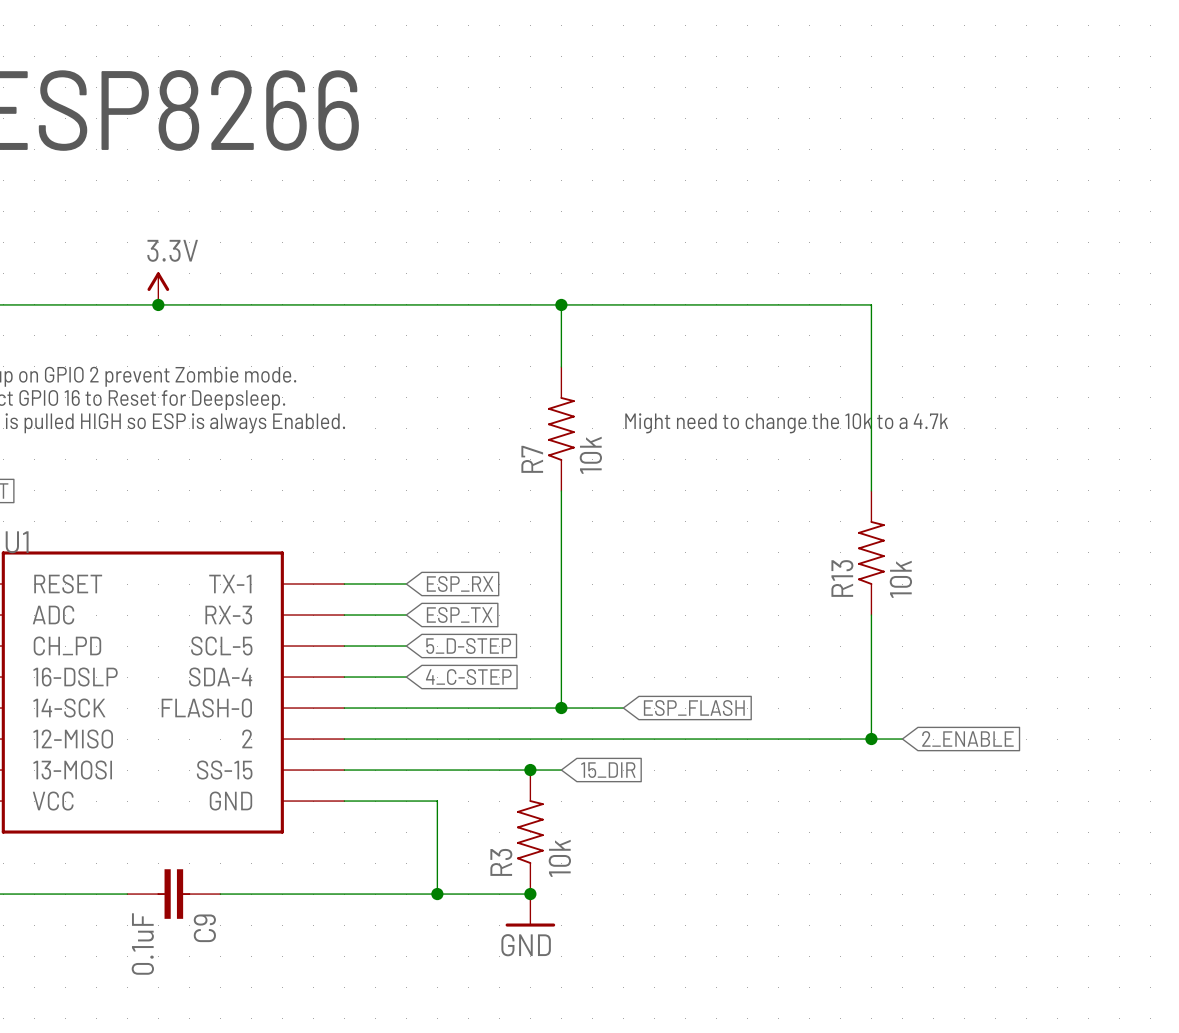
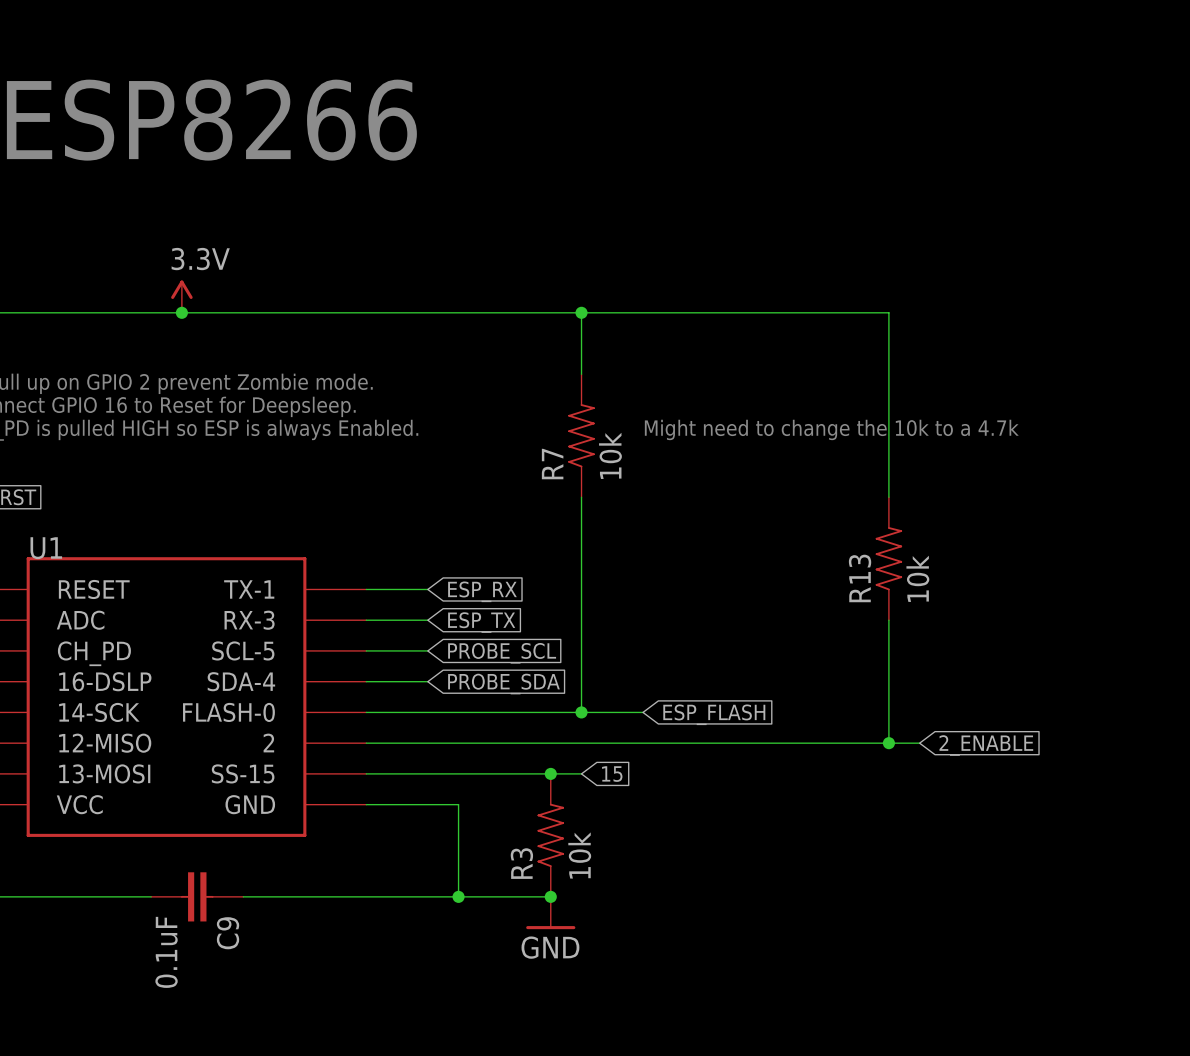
global label: 5_D-STEP (468, 646) -> PROBE_SCL (502, 653)
global label: 4_C-STEP (468, 677) -> PROBE_SDA (503, 684)
global label: 15_DIR (608, 770) -> 15 (612, 774)

